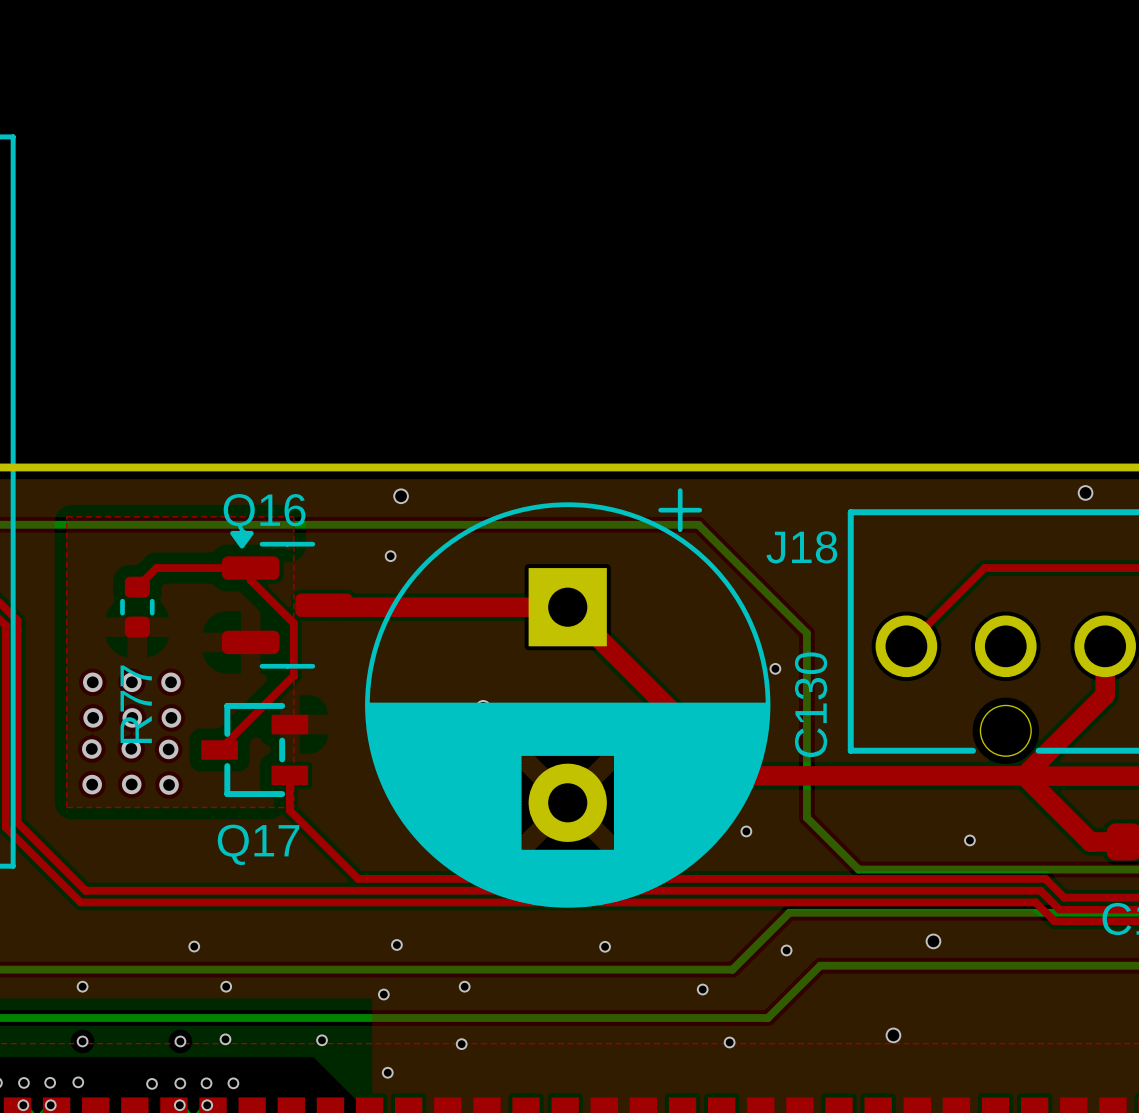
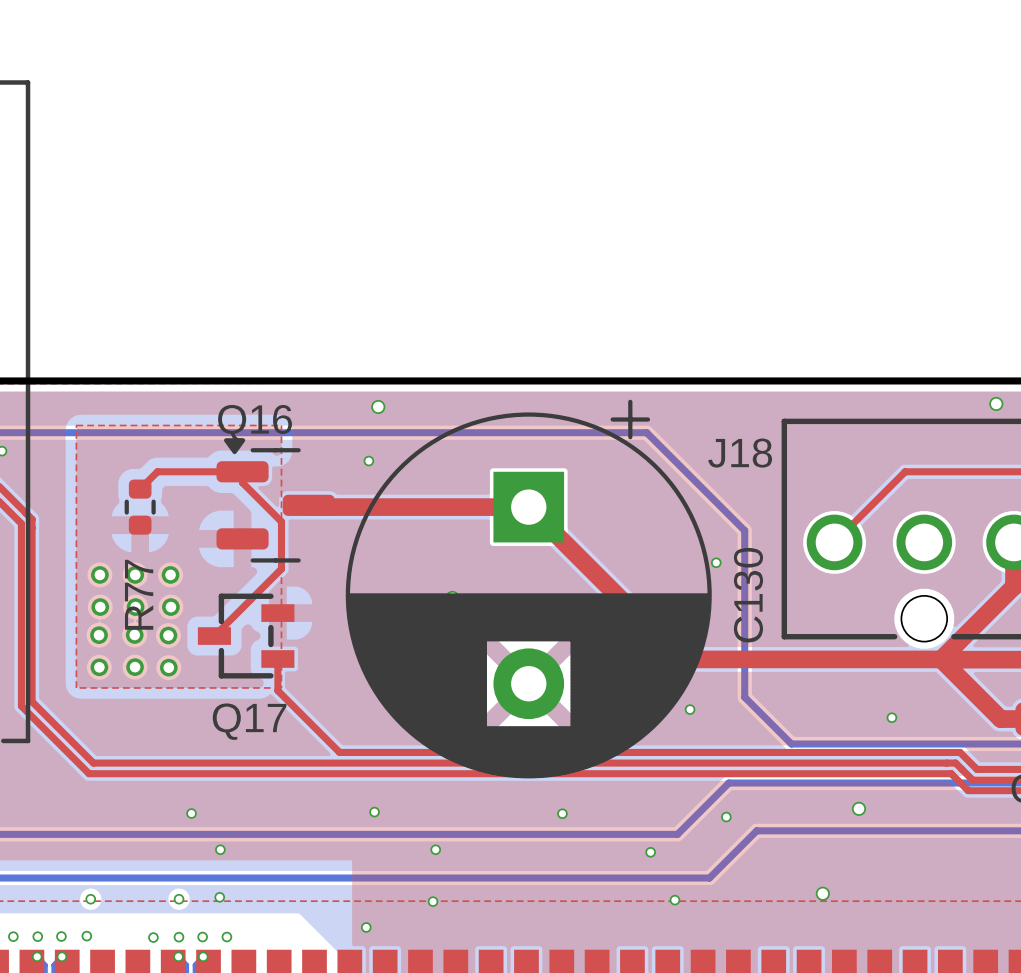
via: (82, 986) -> none
via: (383, 994) -> none
via: (322, 1040) -> none

